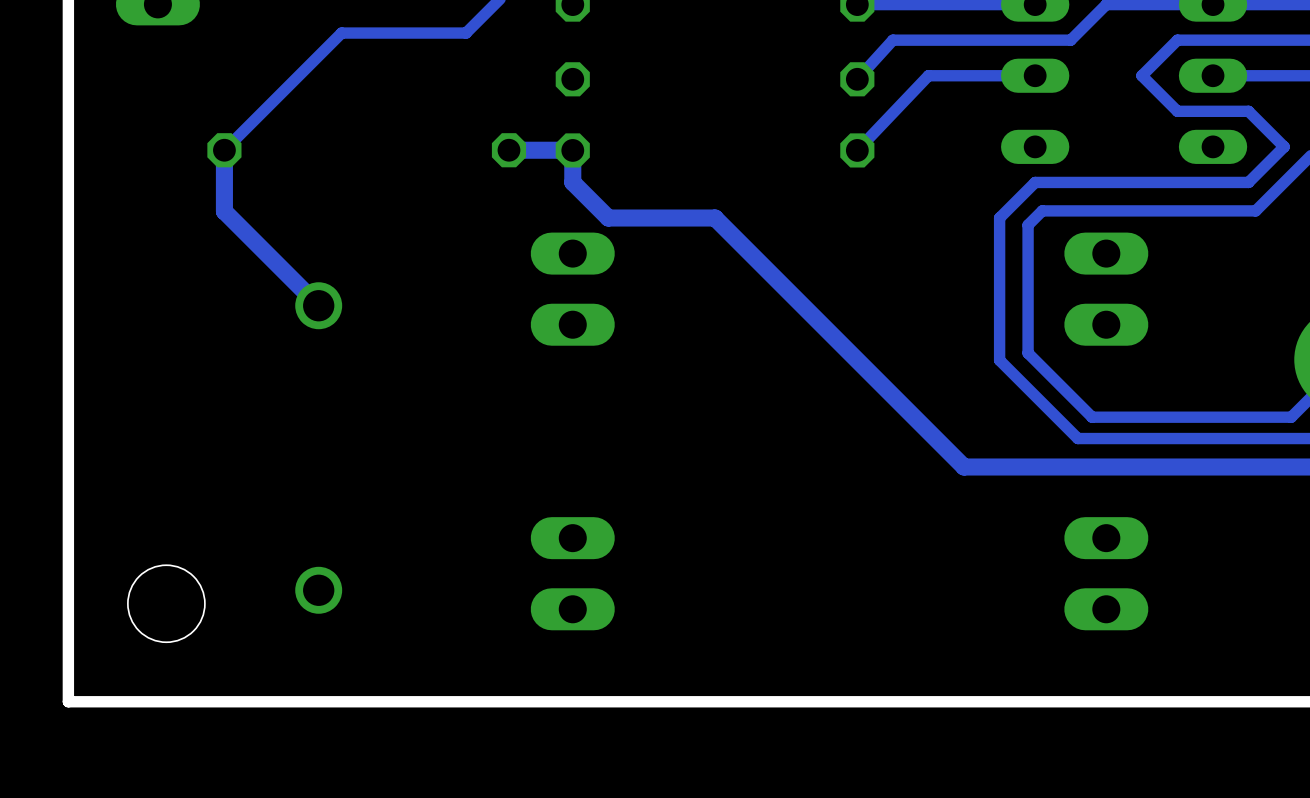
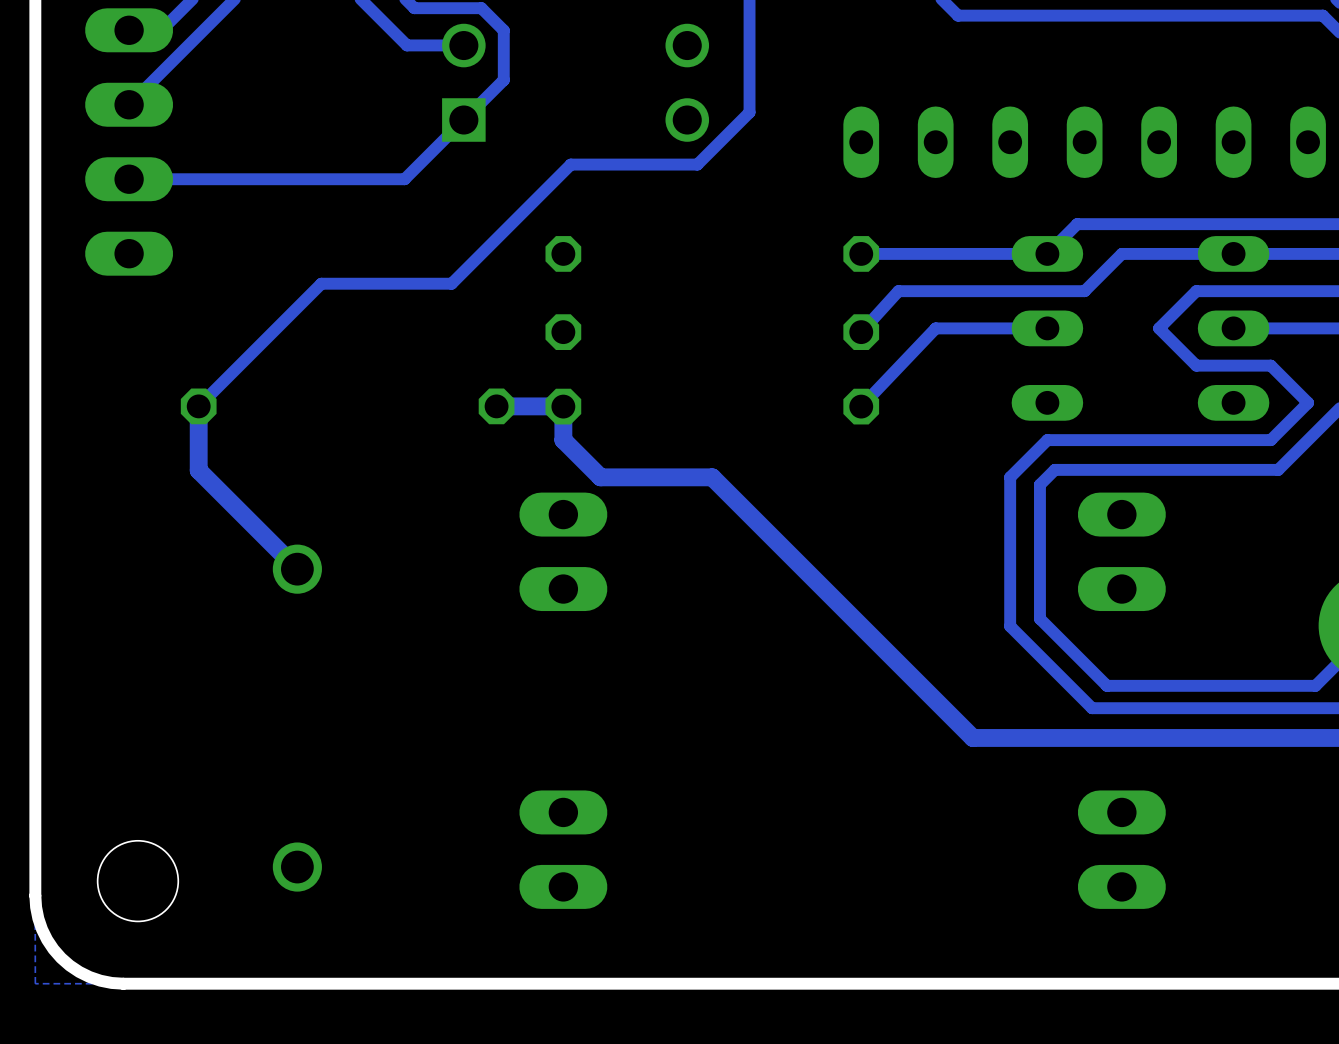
board edge: (68, 617) (68, 701) (152, 701) -> (35, 895) (38, 918) (42, 929) (53, 949) (61, 957) (69, 965) (89, 977) (100, 980) (123, 983)

